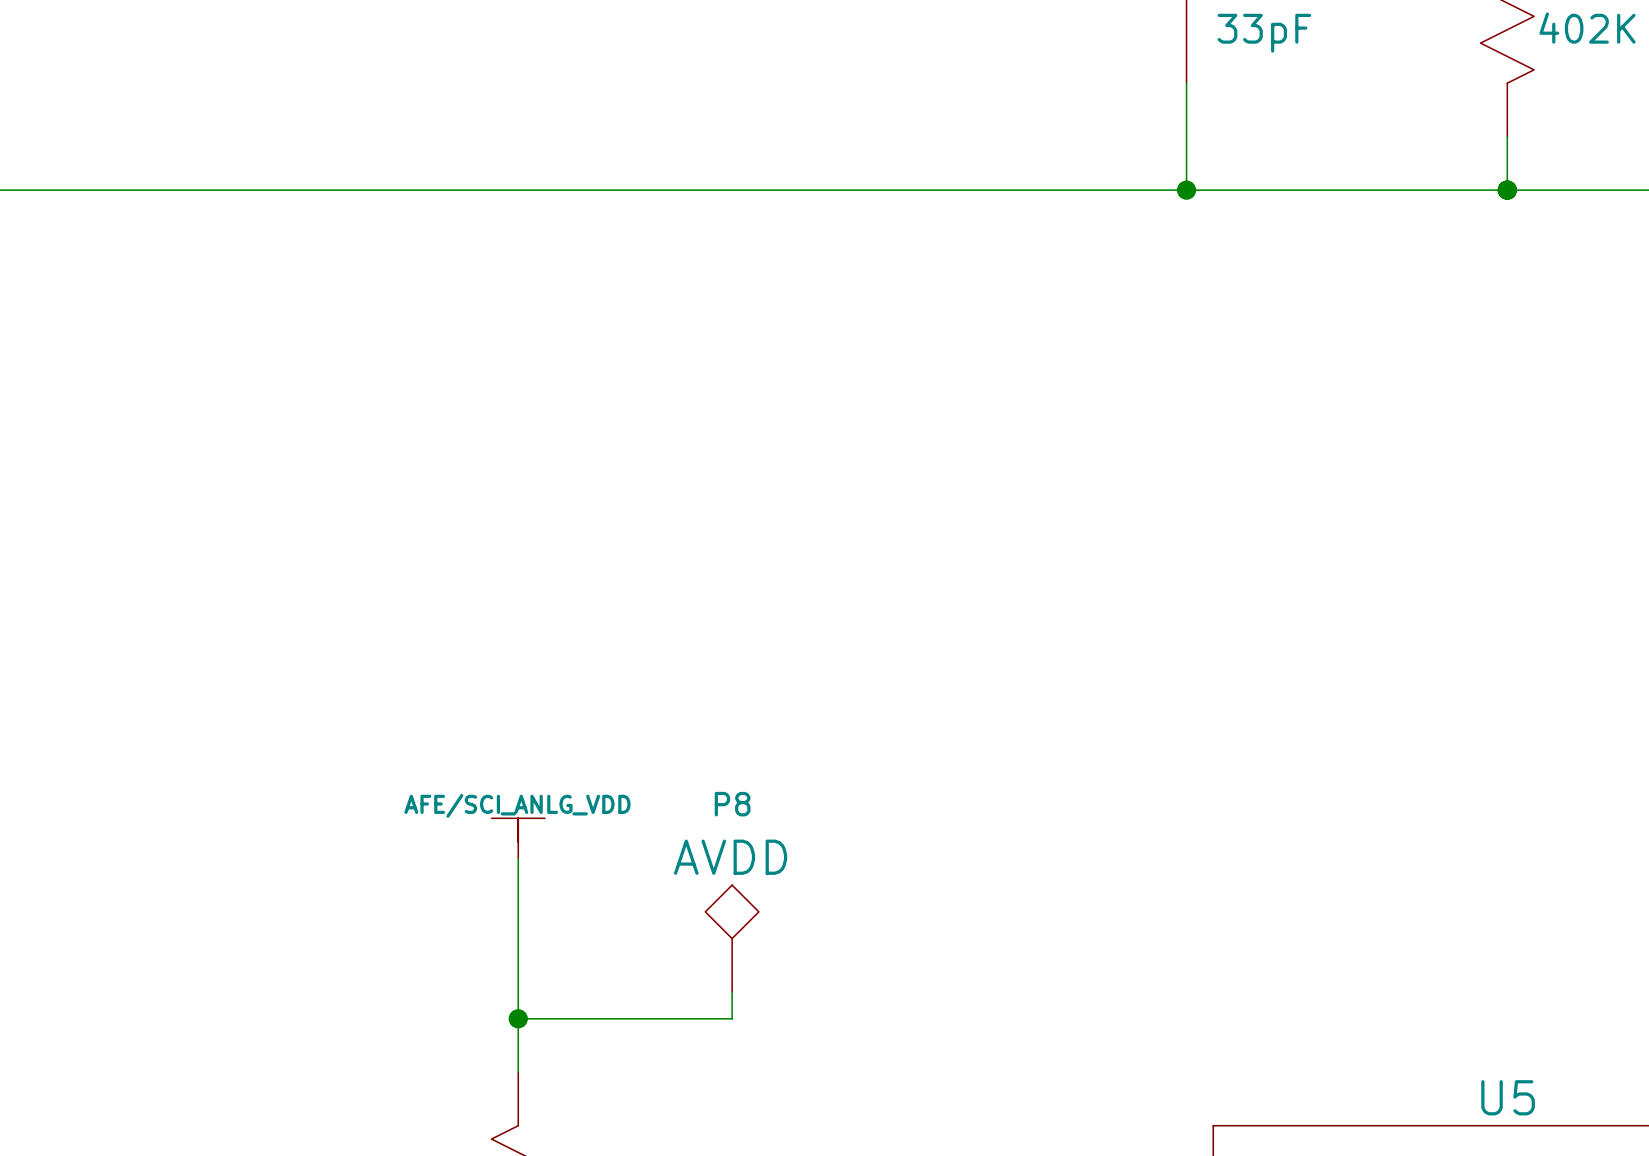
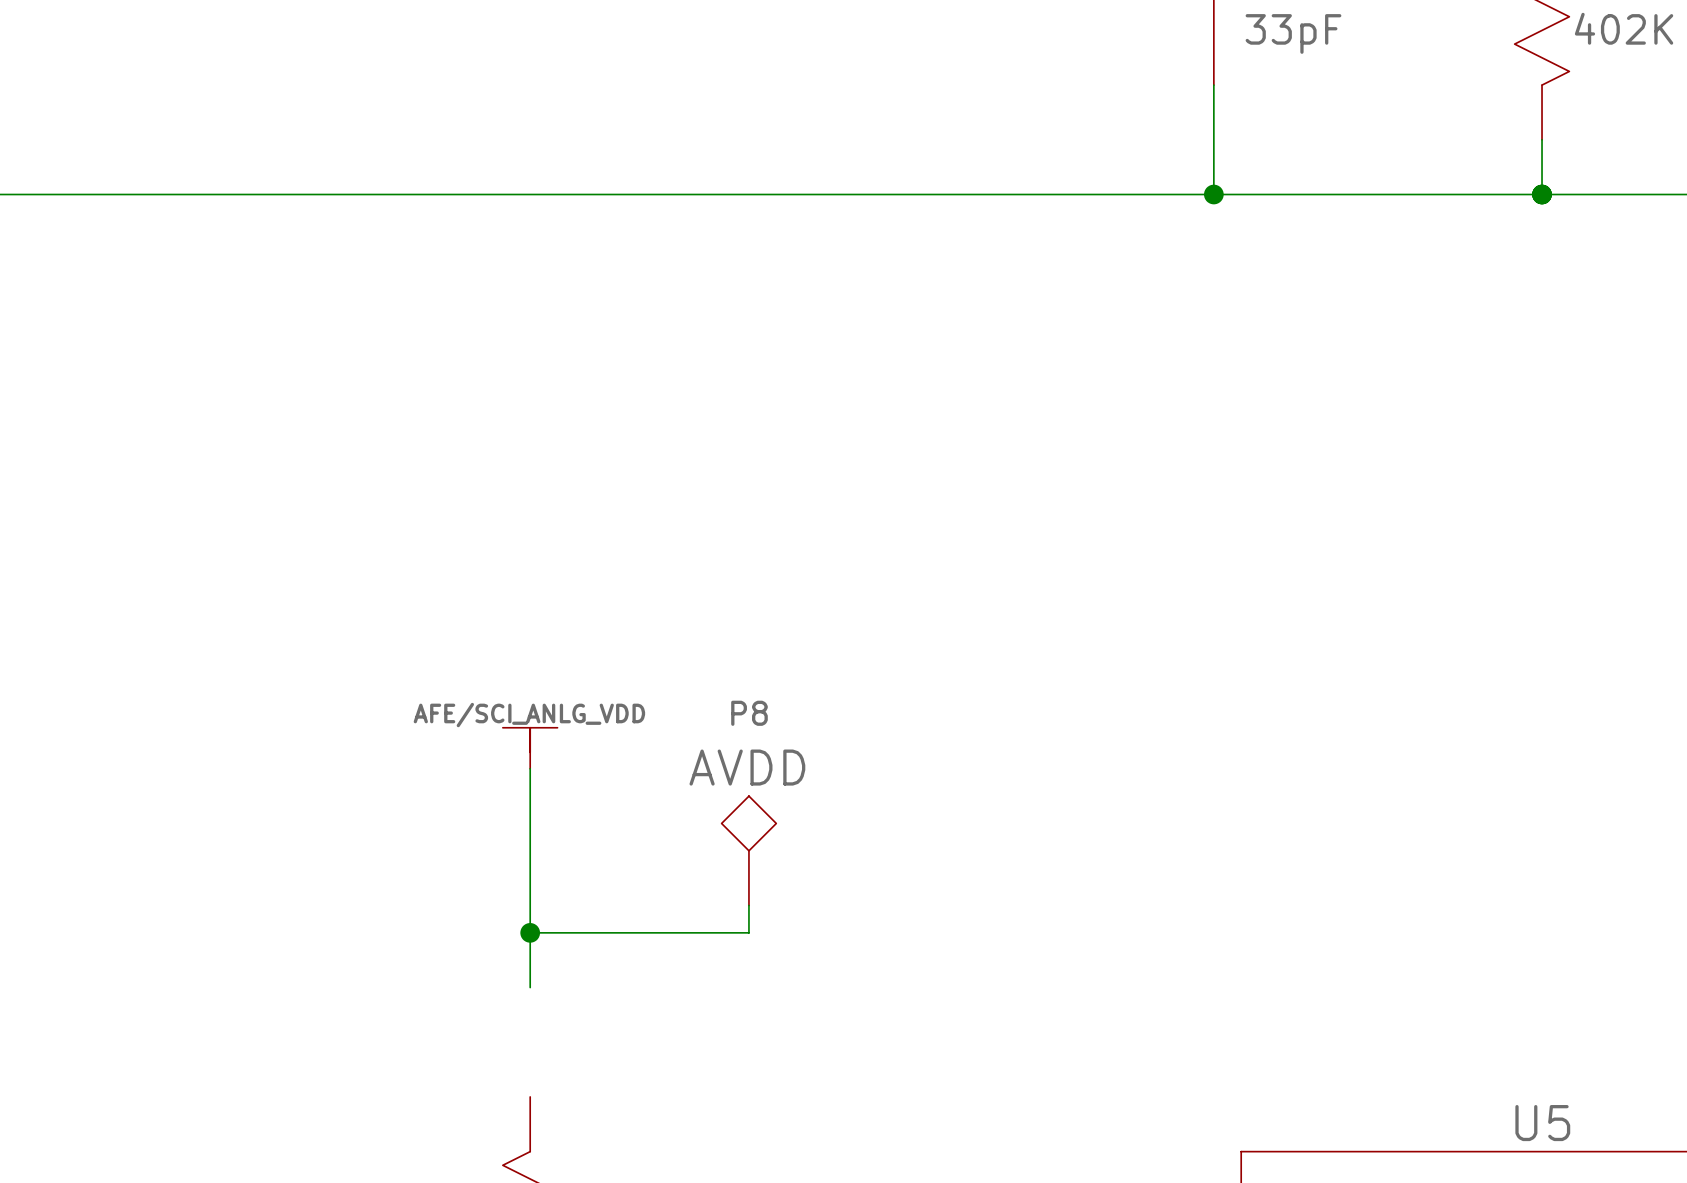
power symbol position: AFE/SCI_ANLG_VDD (518, 838) -> AFE/SCI_ANLG_VDD (530, 748)
P8 position: (732, 938) -> (748, 850)
wire: (518, 965) (518, 1072) -> (530, 768) (530, 878)
wire: (732, 992) (732, 1018) (518, 1018) -> (748, 905) (748, 932) (530, 932)
junction position: (518, 1018) -> (530, 932)

